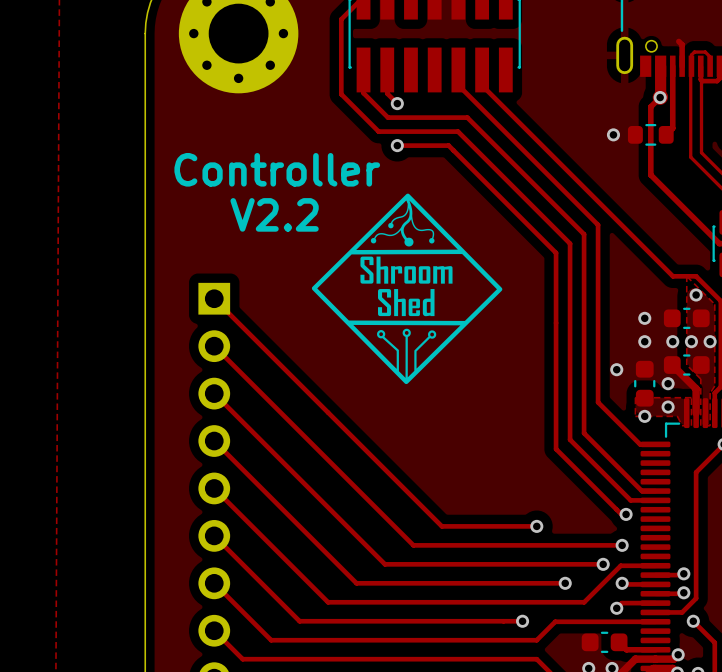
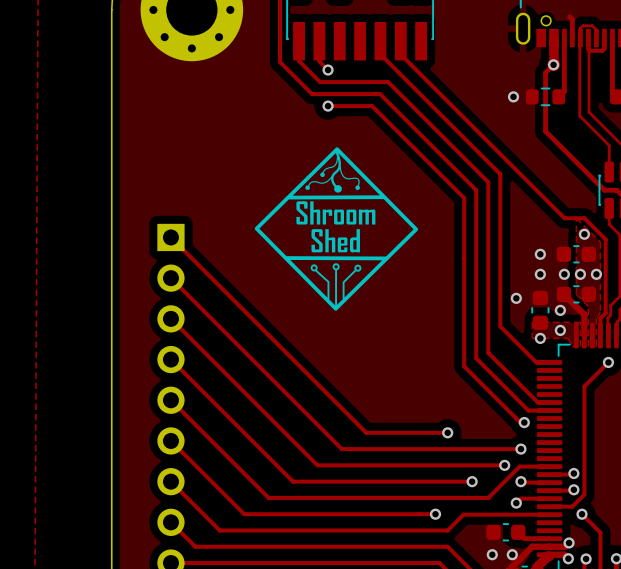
text: Controller (277, 169) -> none
text: V2.2 (274, 214) -> none

